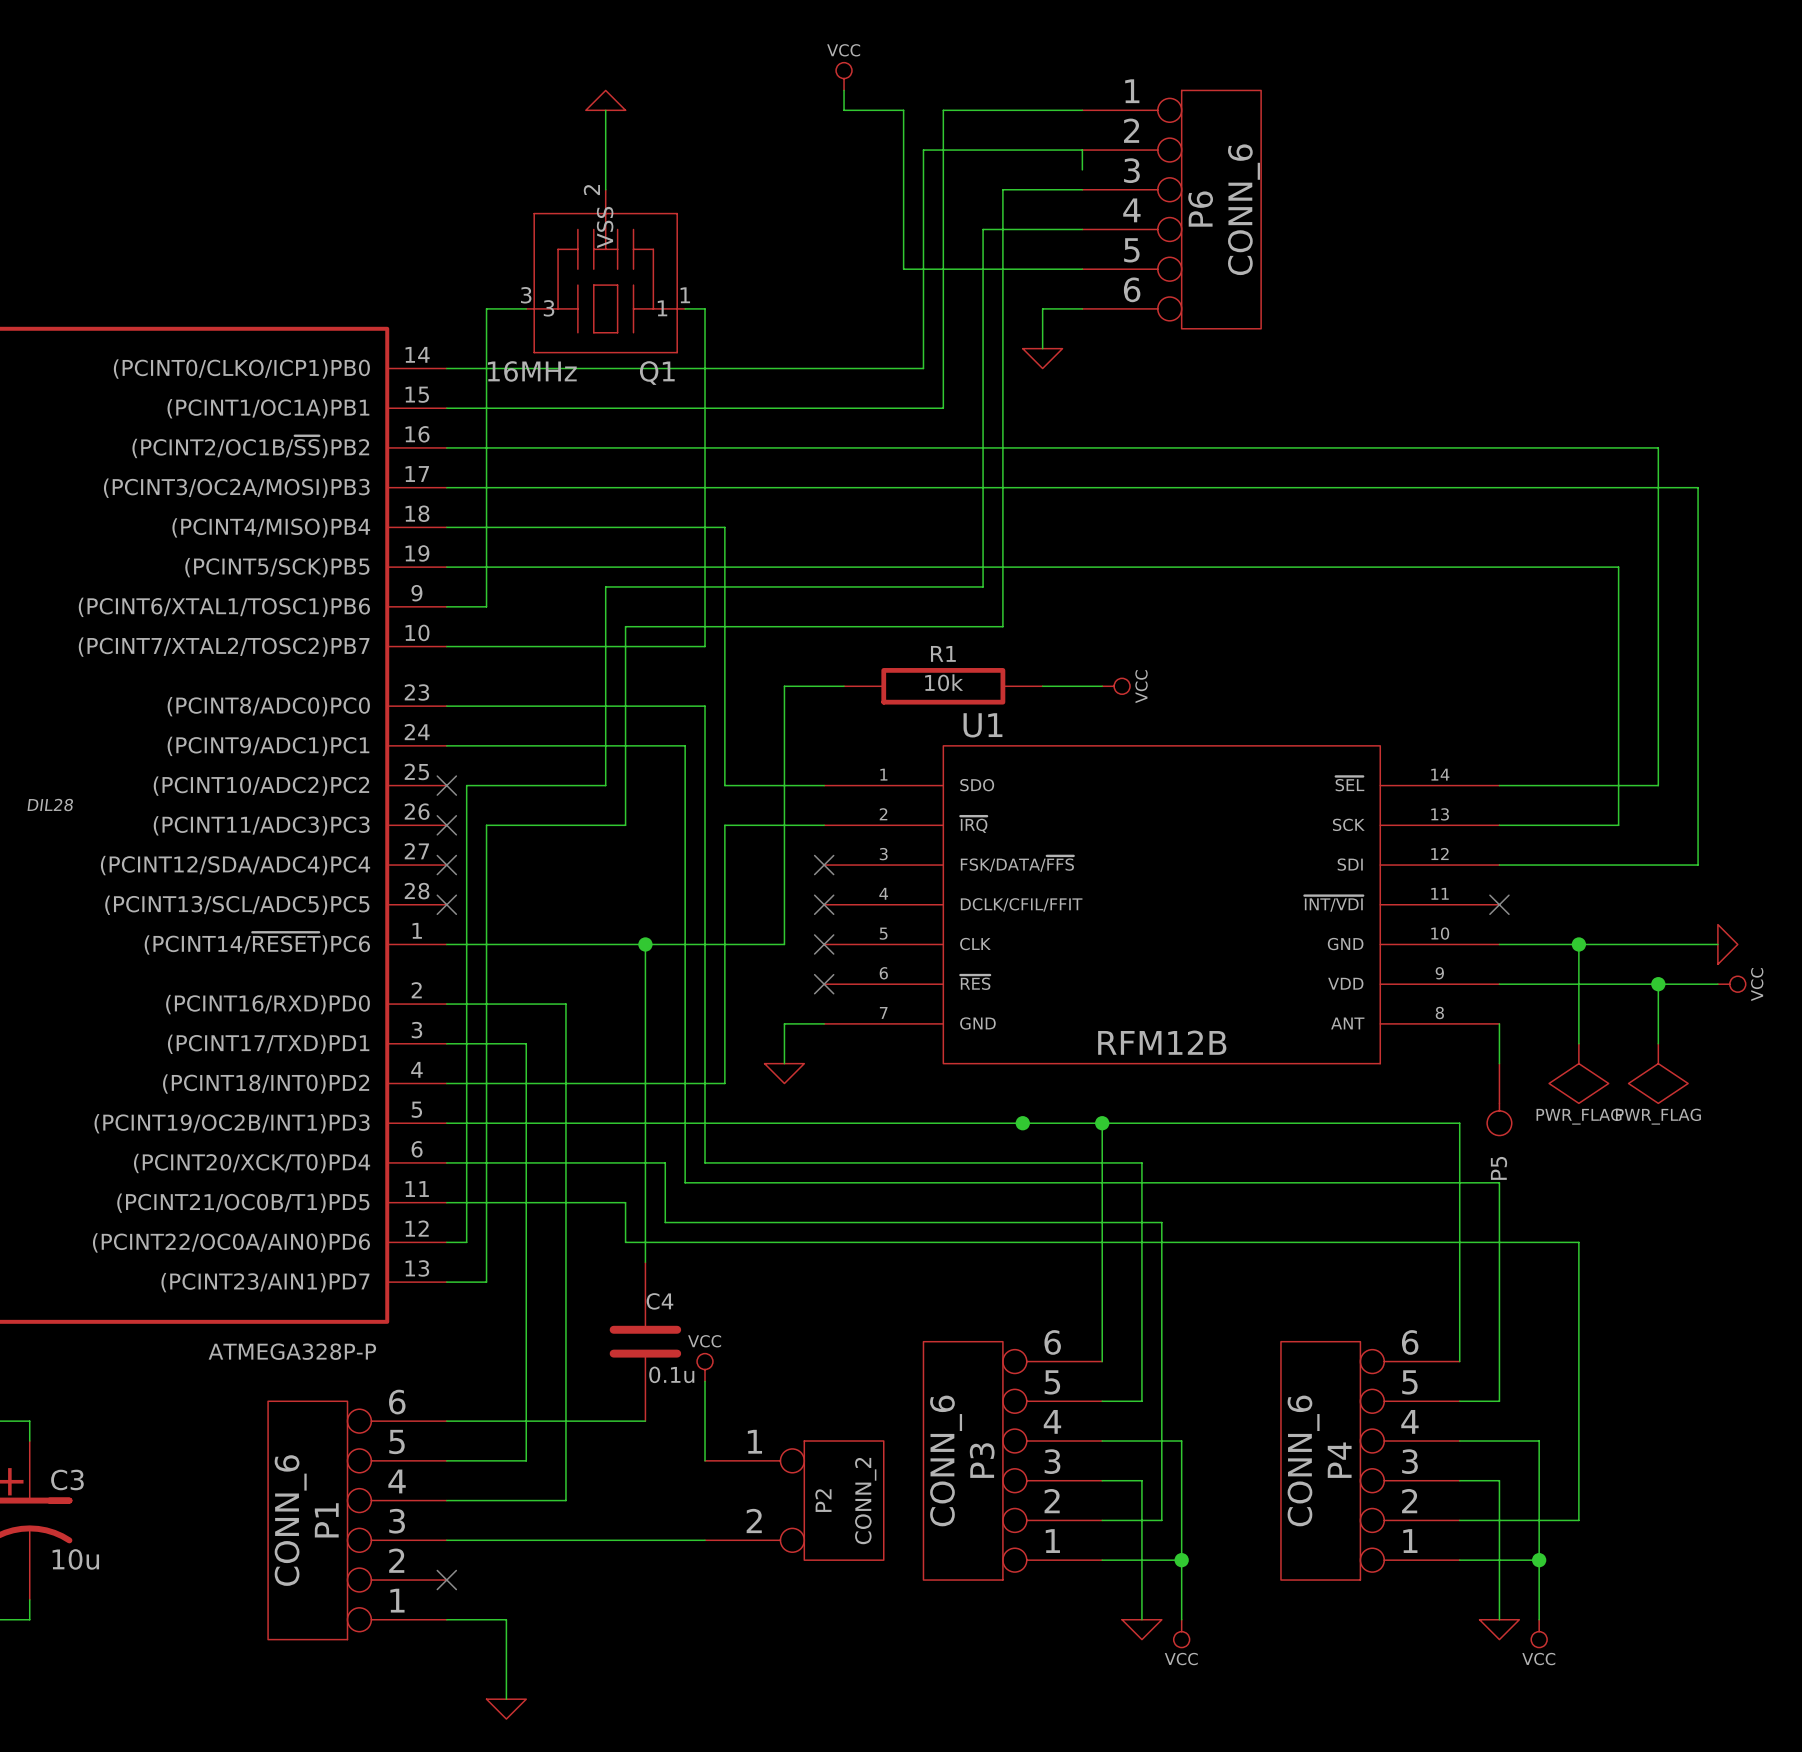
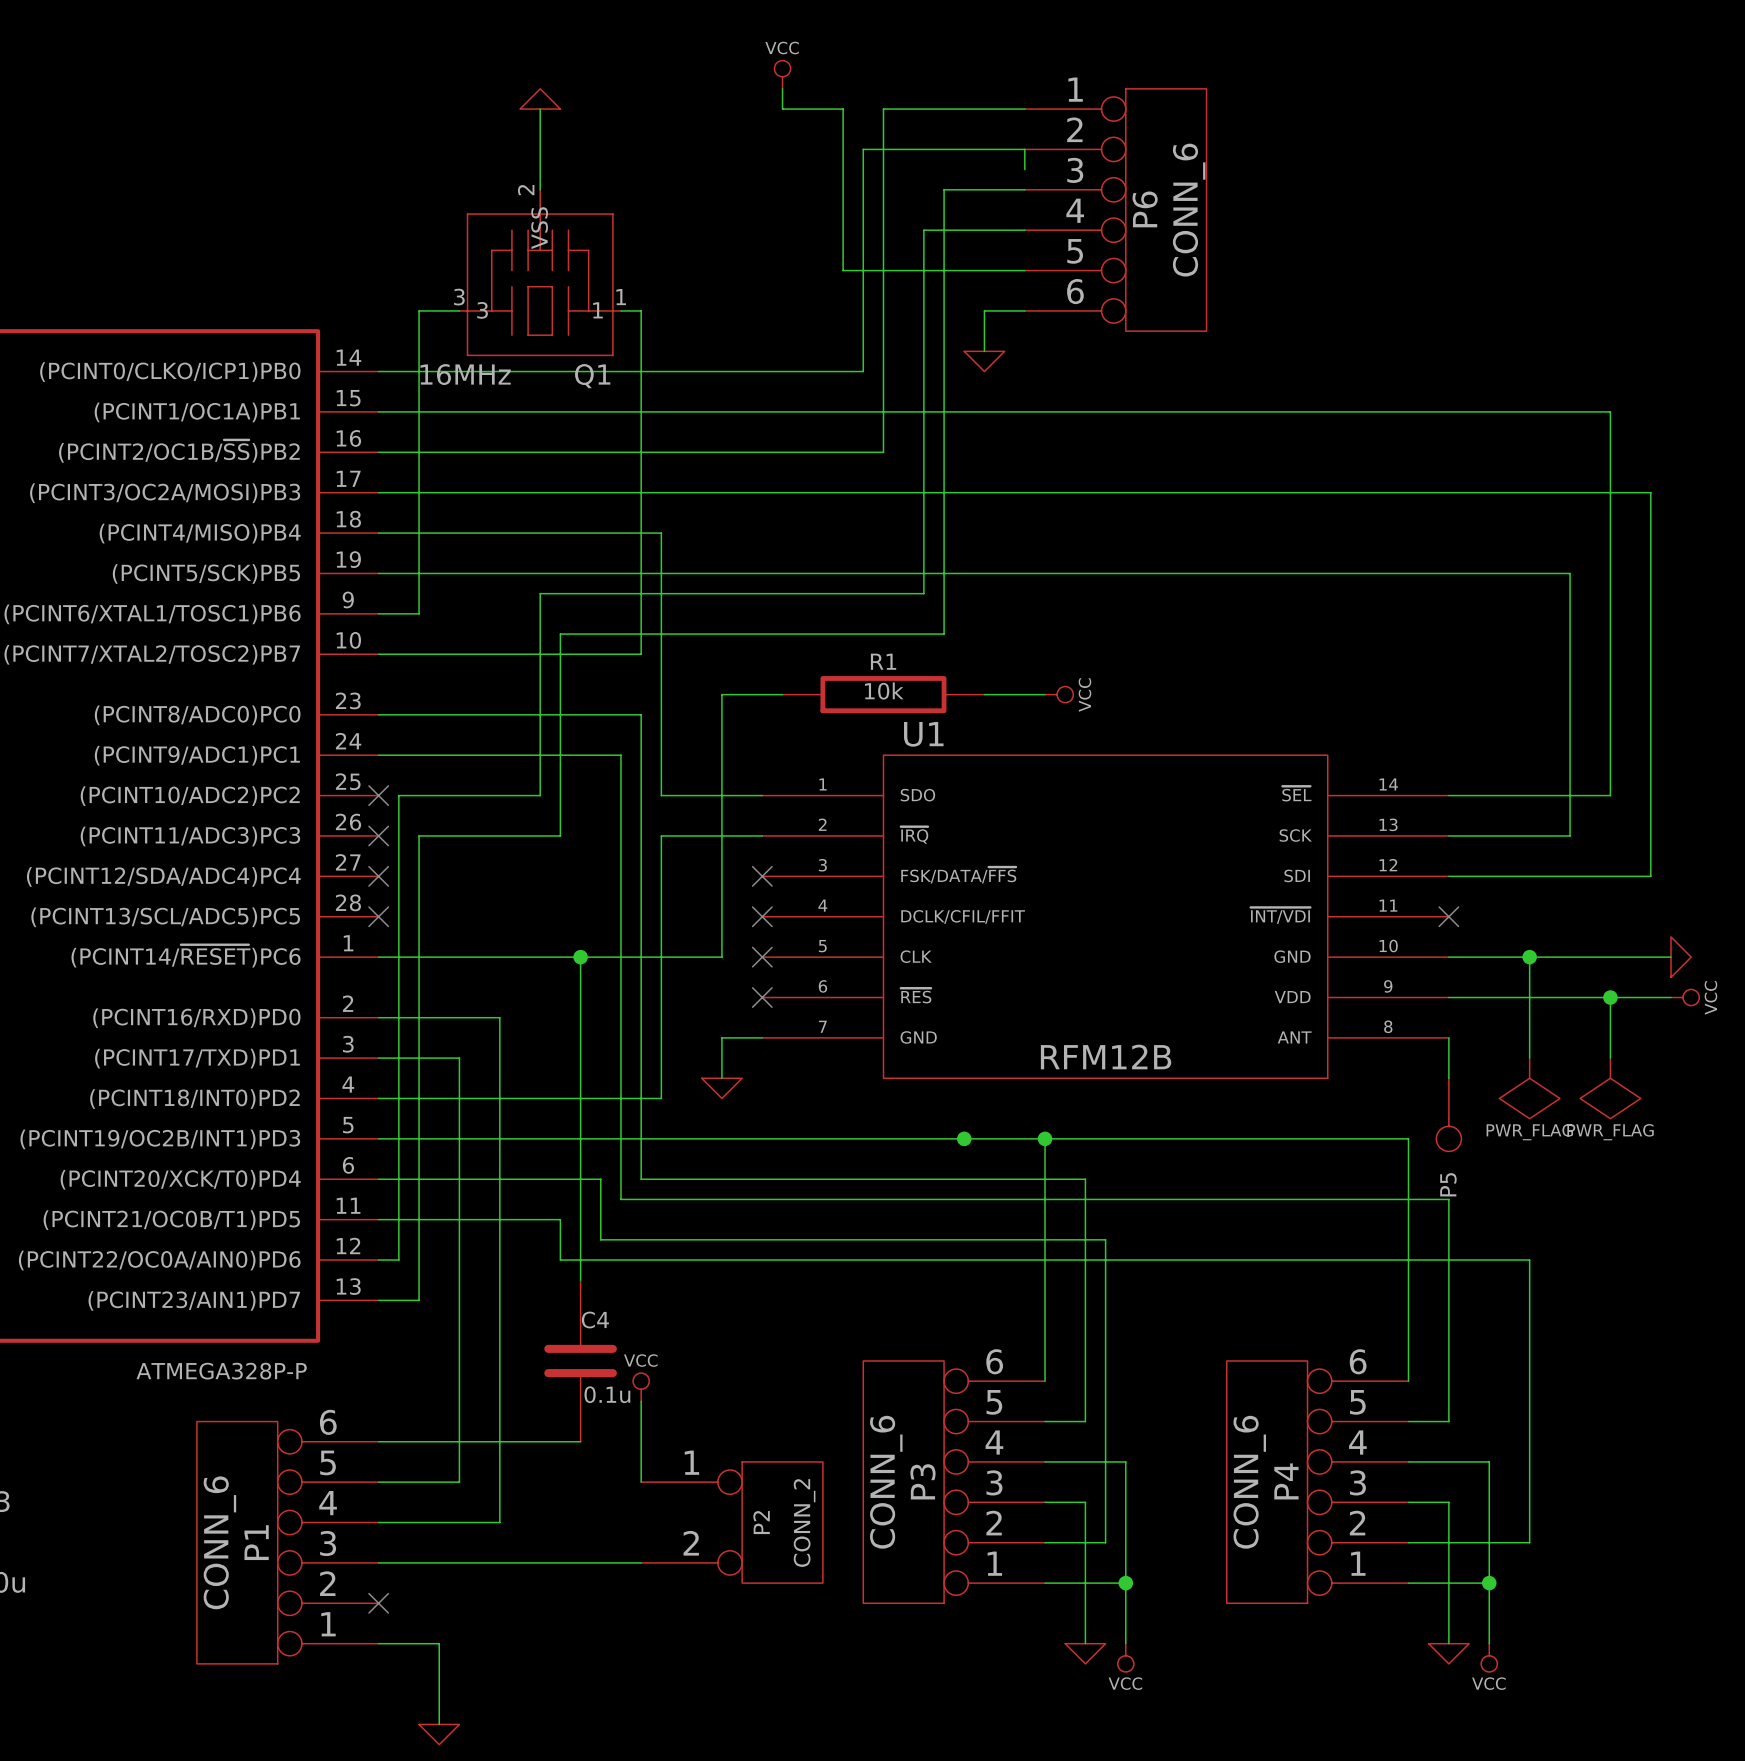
wire: (943, 447) (1658, 447) -> (883, 452) (883, 411) (1610, 411) (1610, 452)

